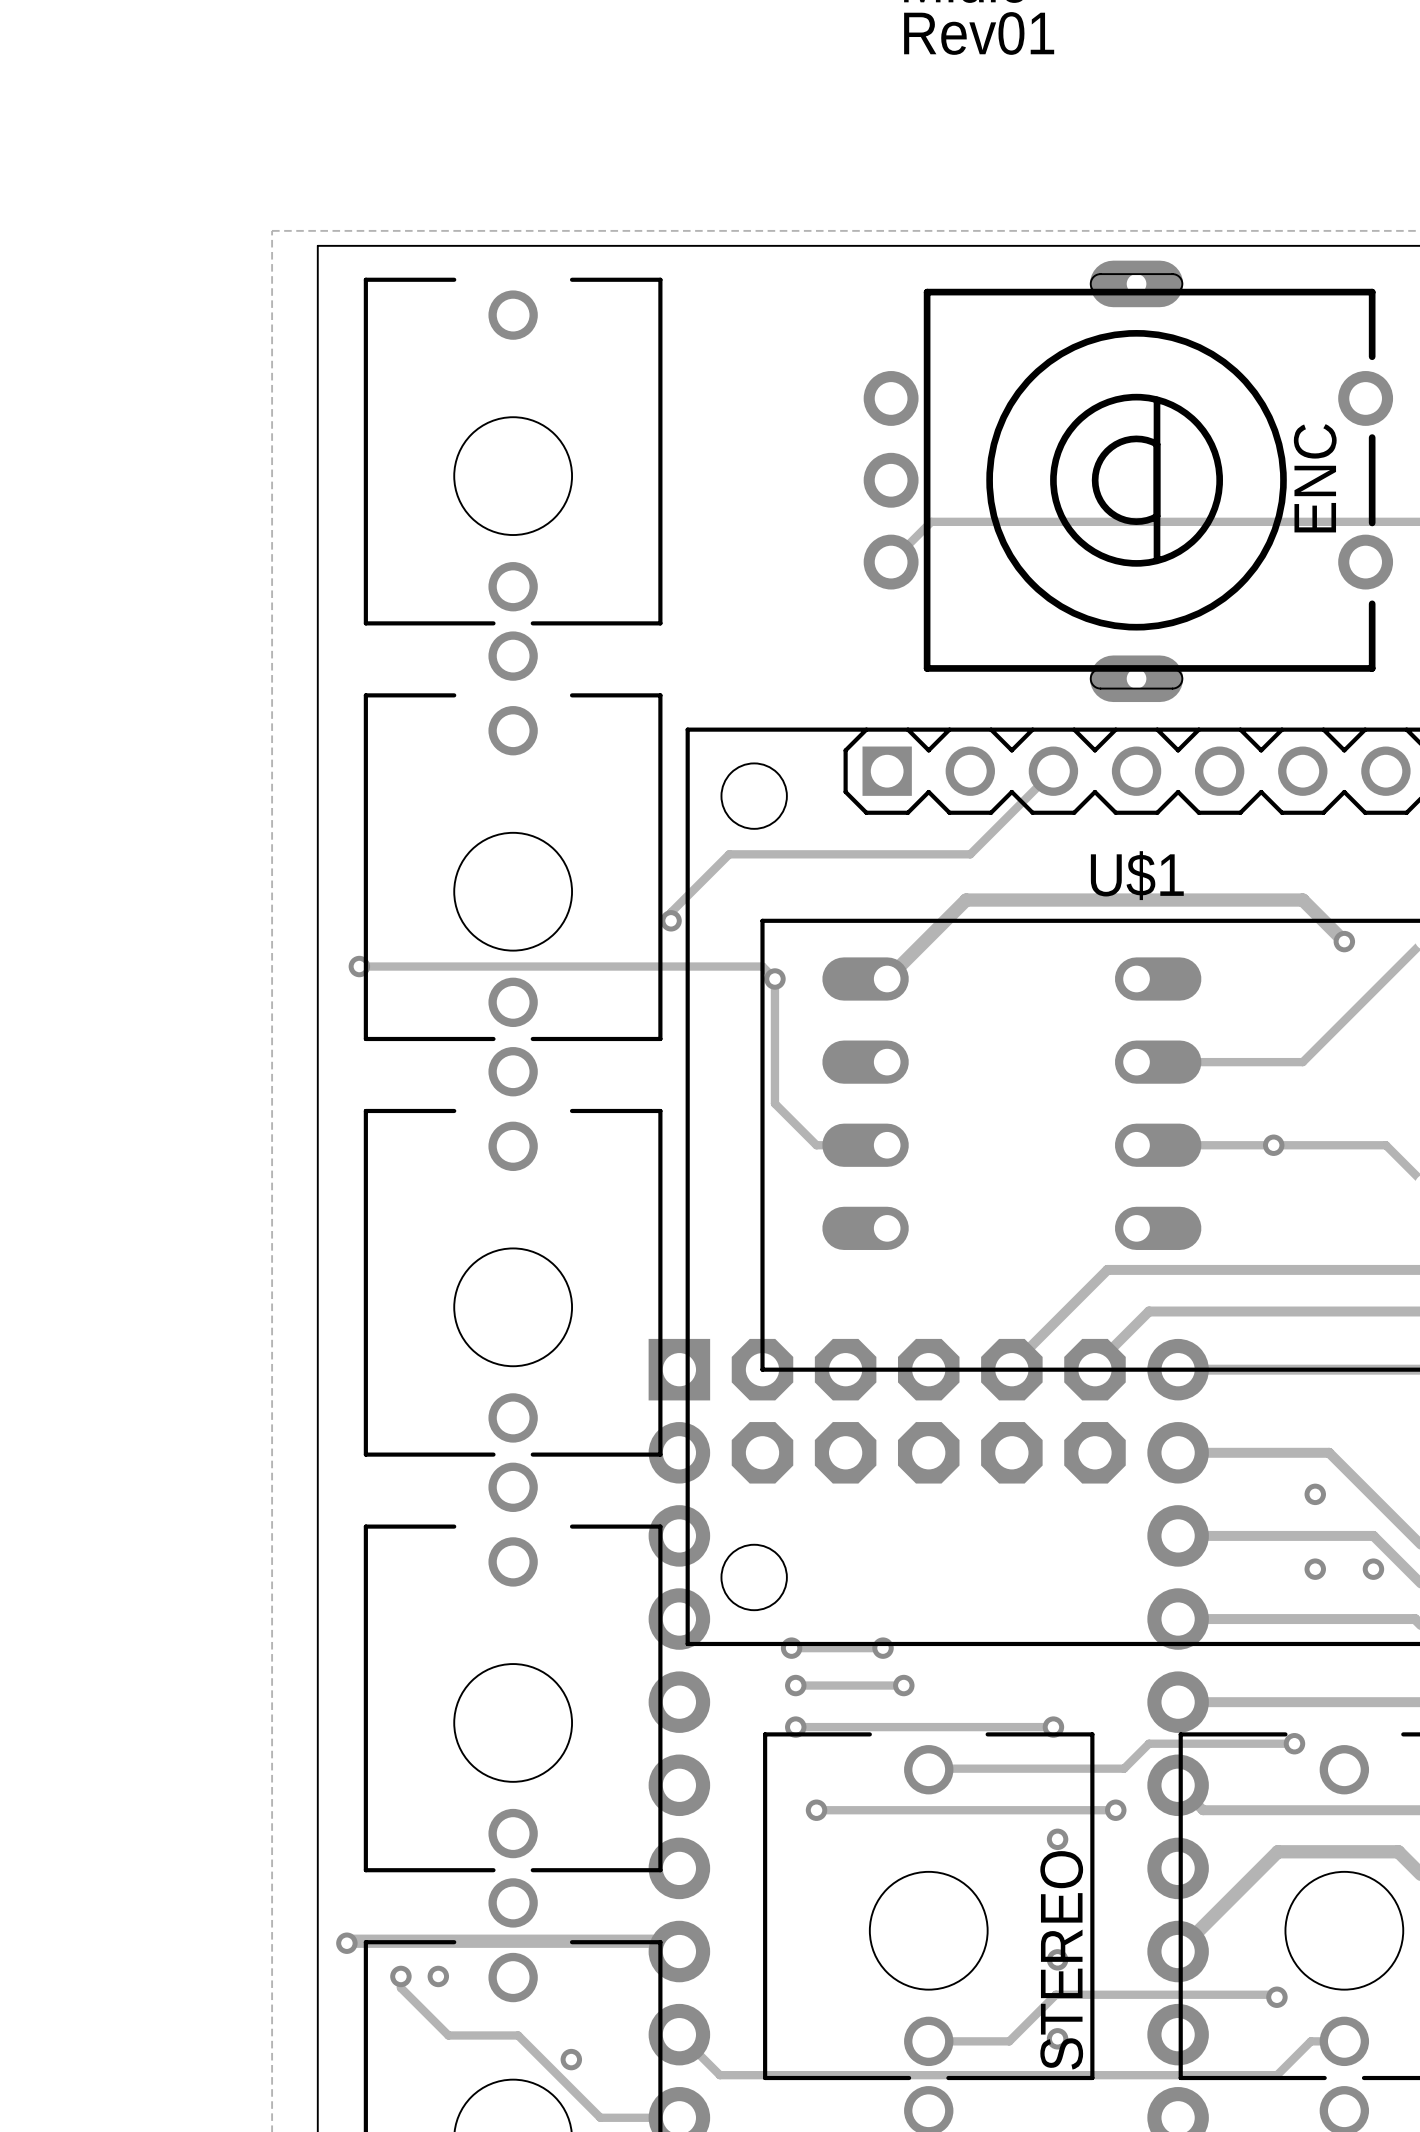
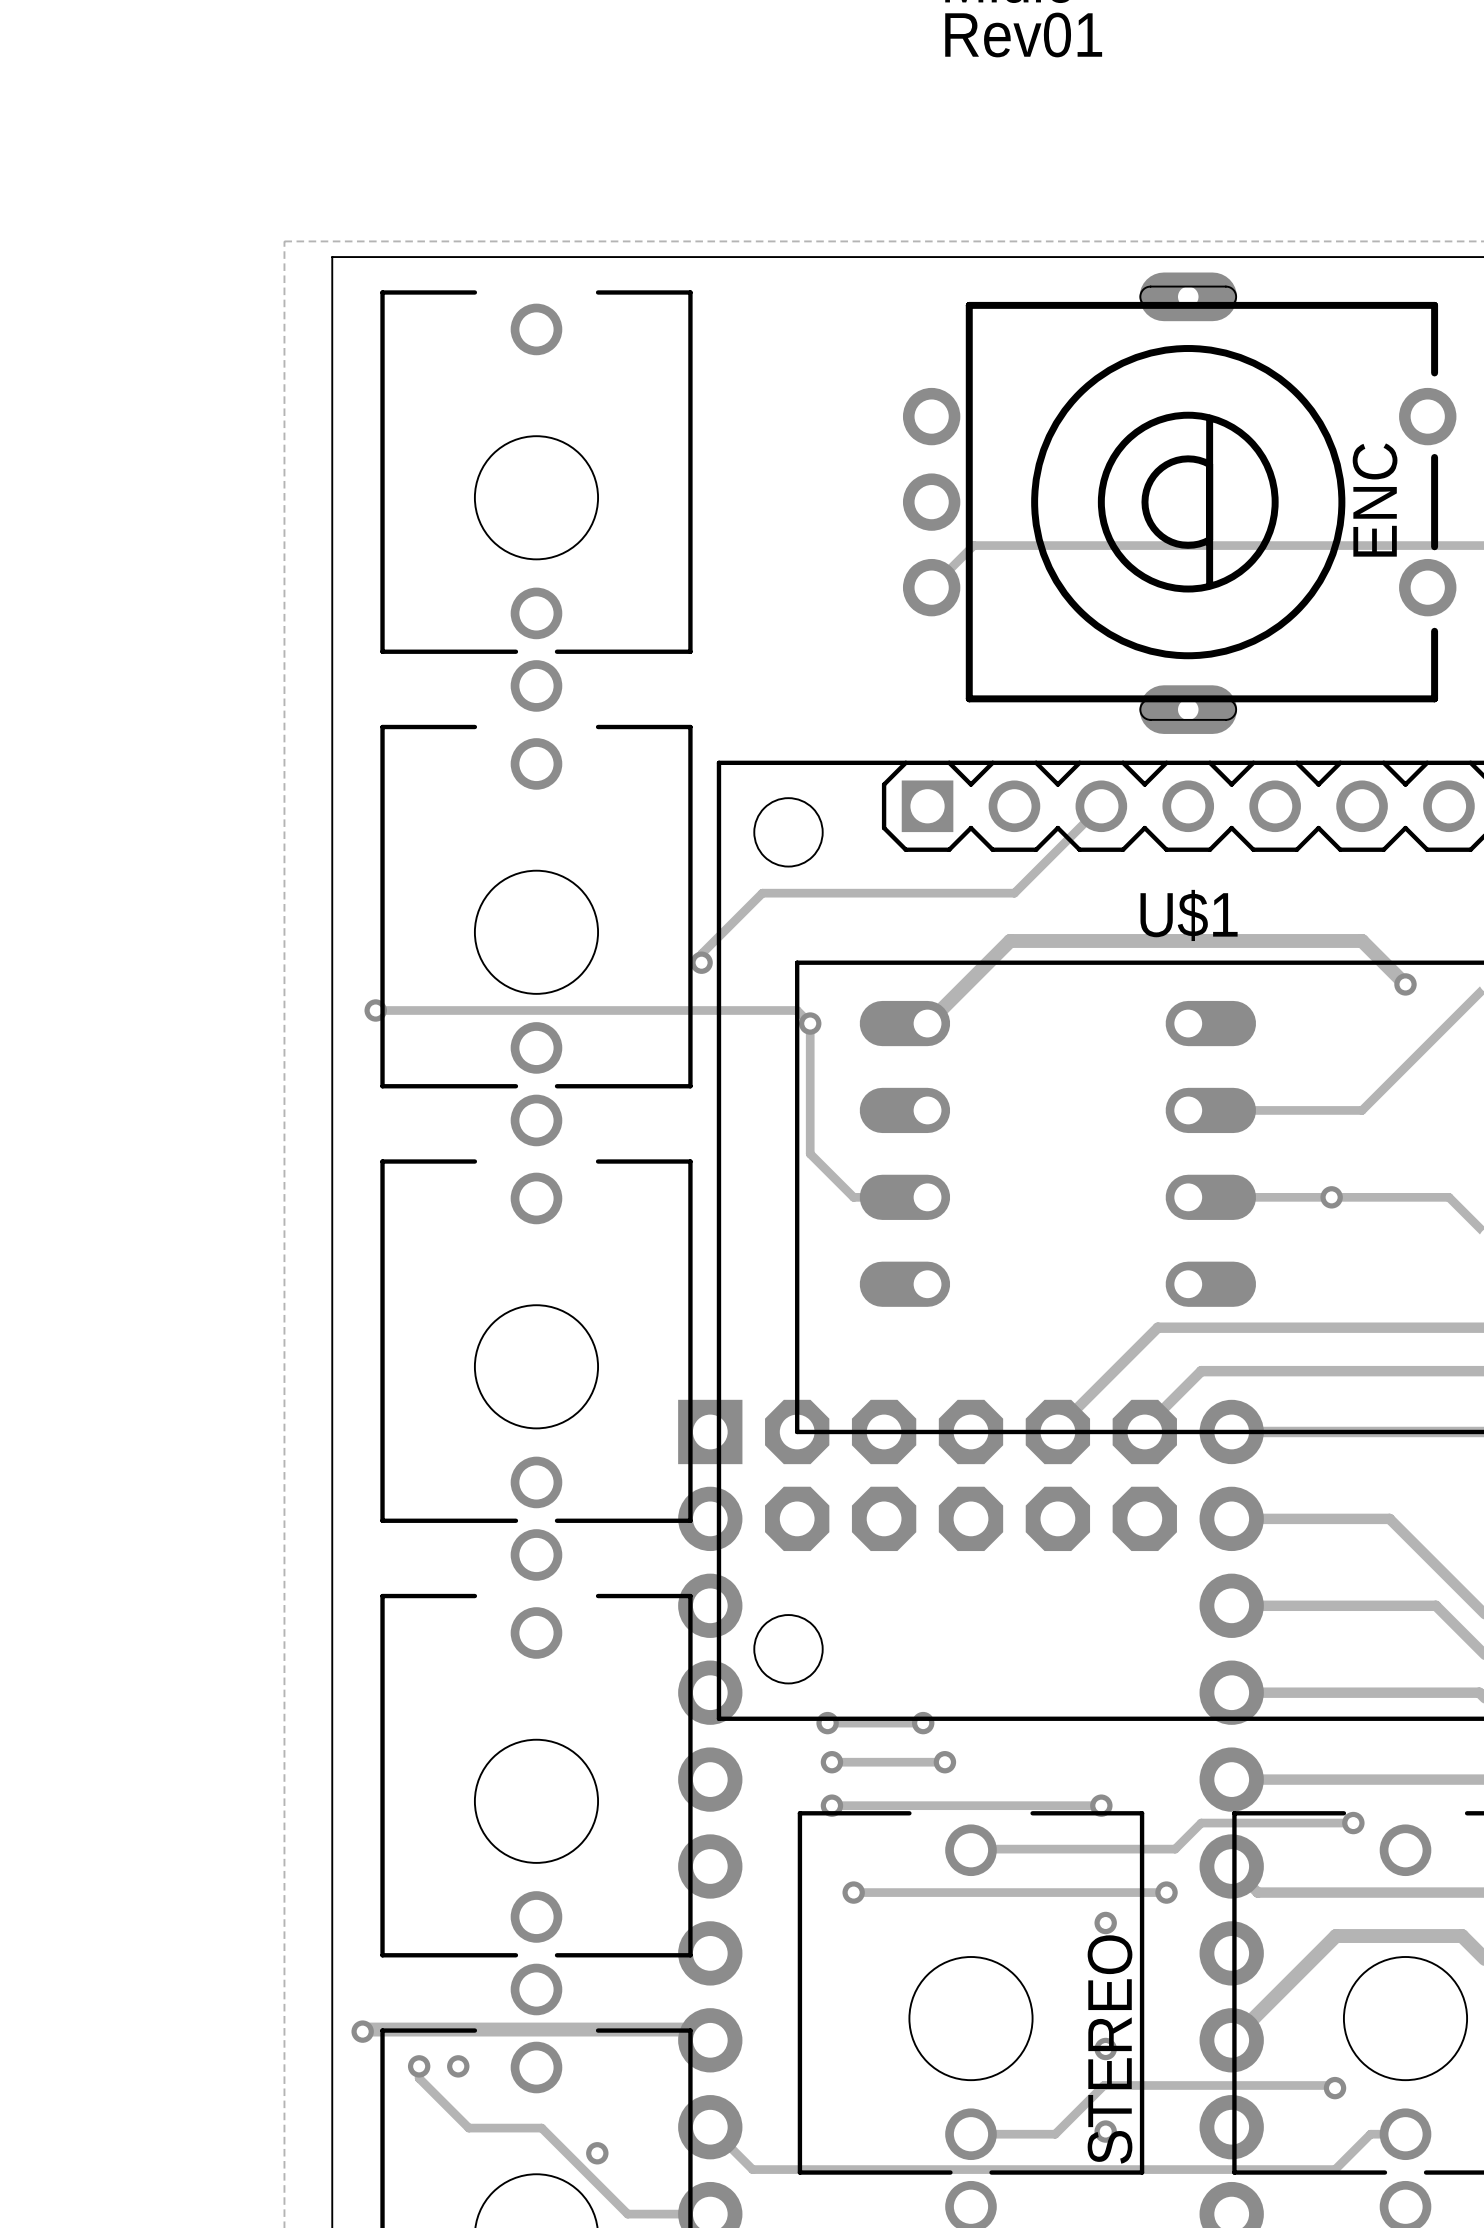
via: (1315, 1494) -> none
via: (1315, 1569) -> none
via: (1373, 1569) -> none

